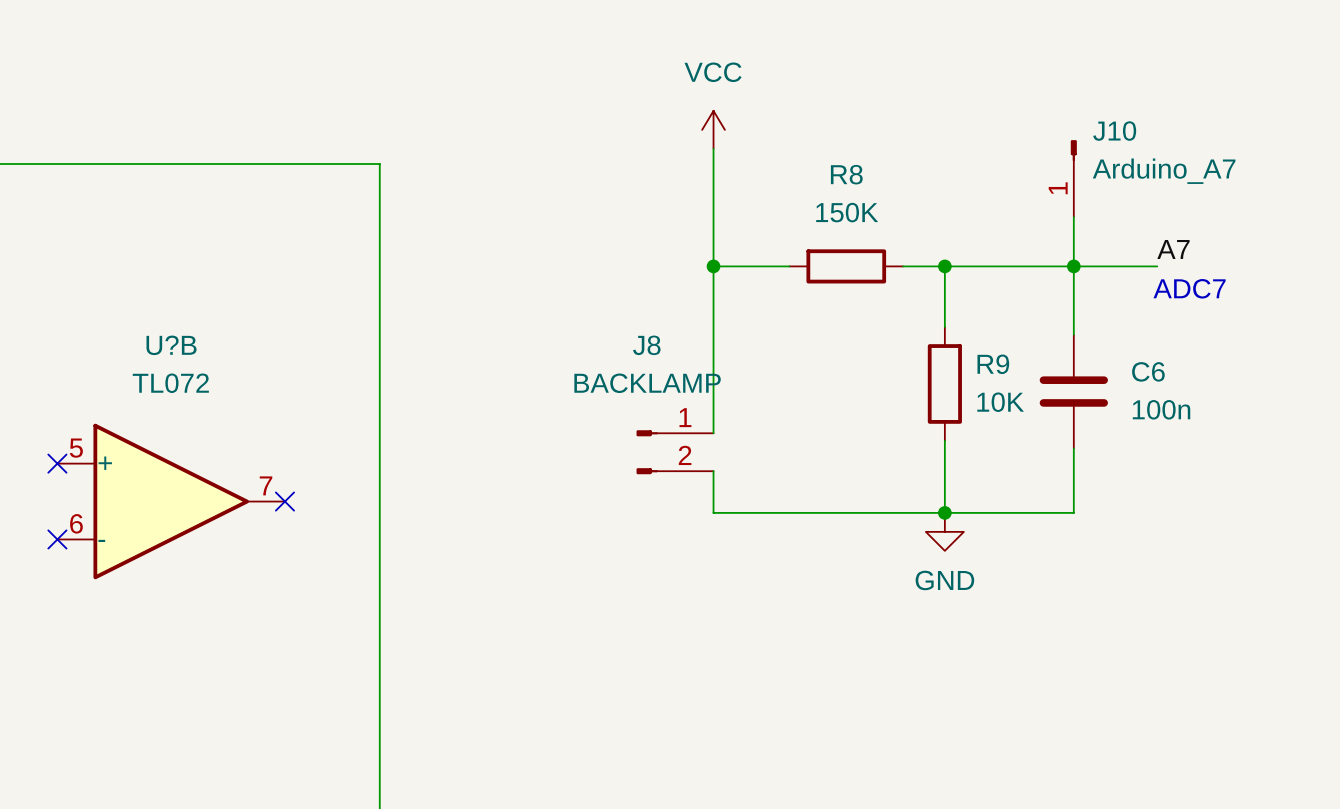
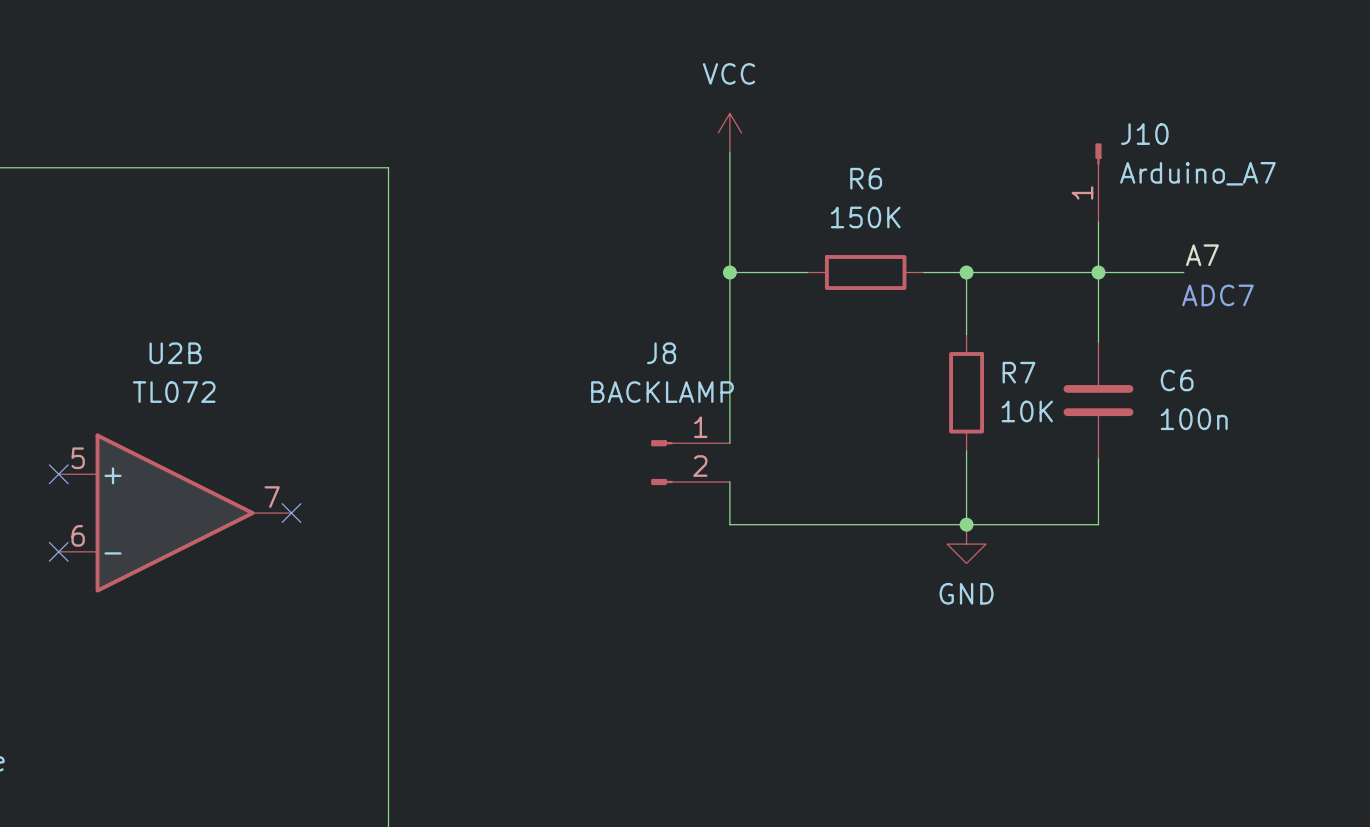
R8 name: R8 (846, 174) -> R6 (866, 178)
U?B name: U?B (171, 345) -> U2B (175, 353)
R9 name: R9 (993, 364) -> R7 (1018, 372)

